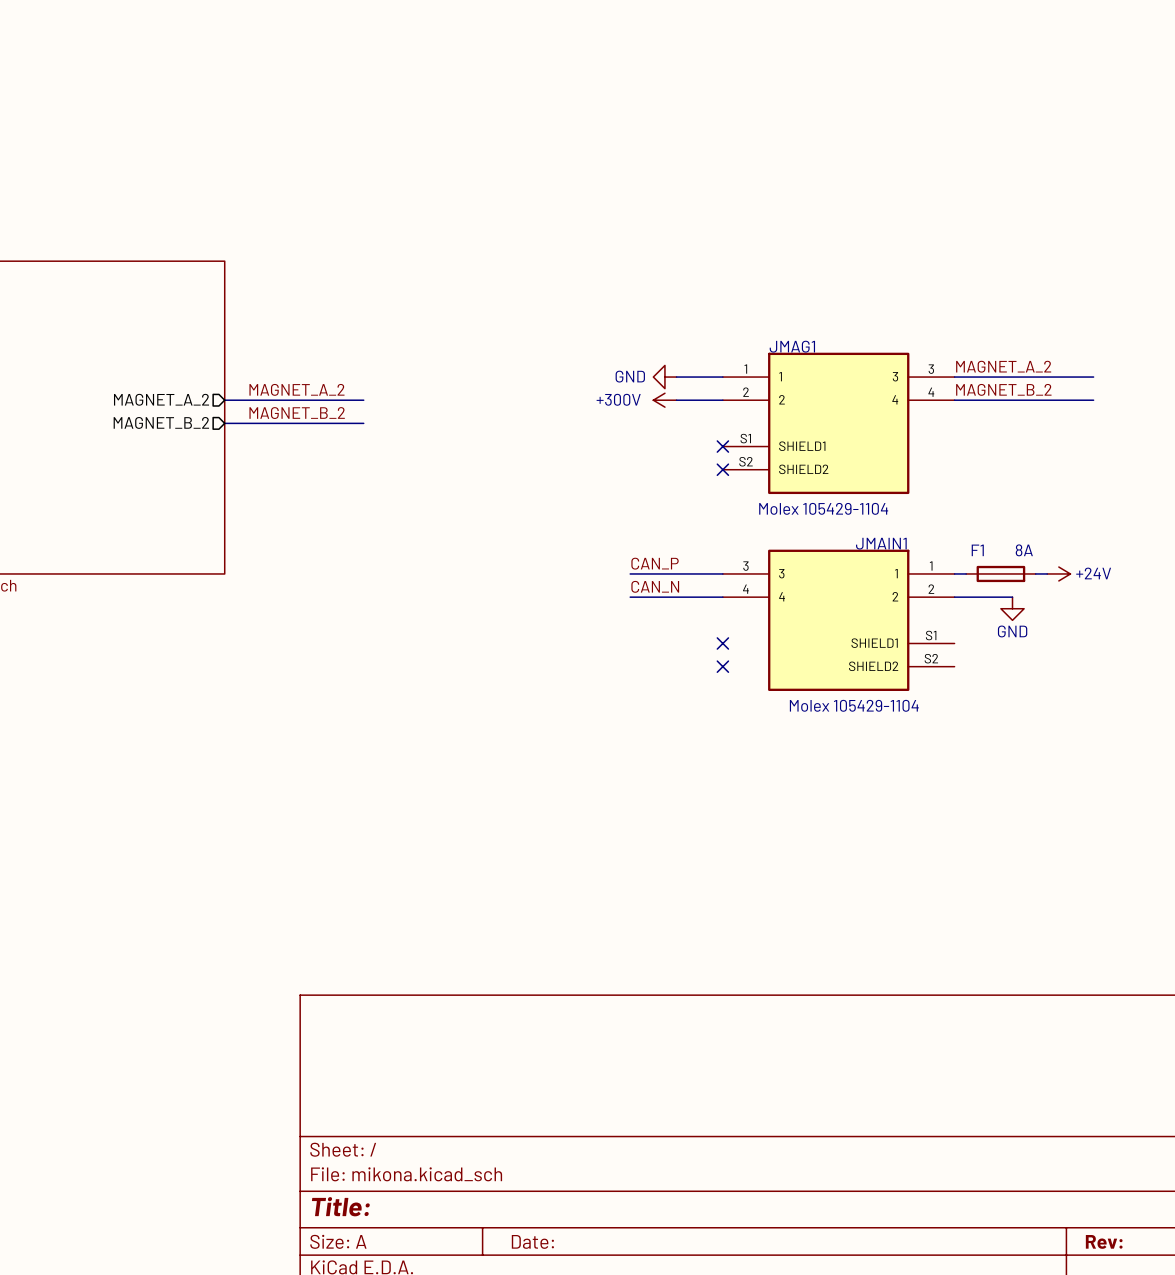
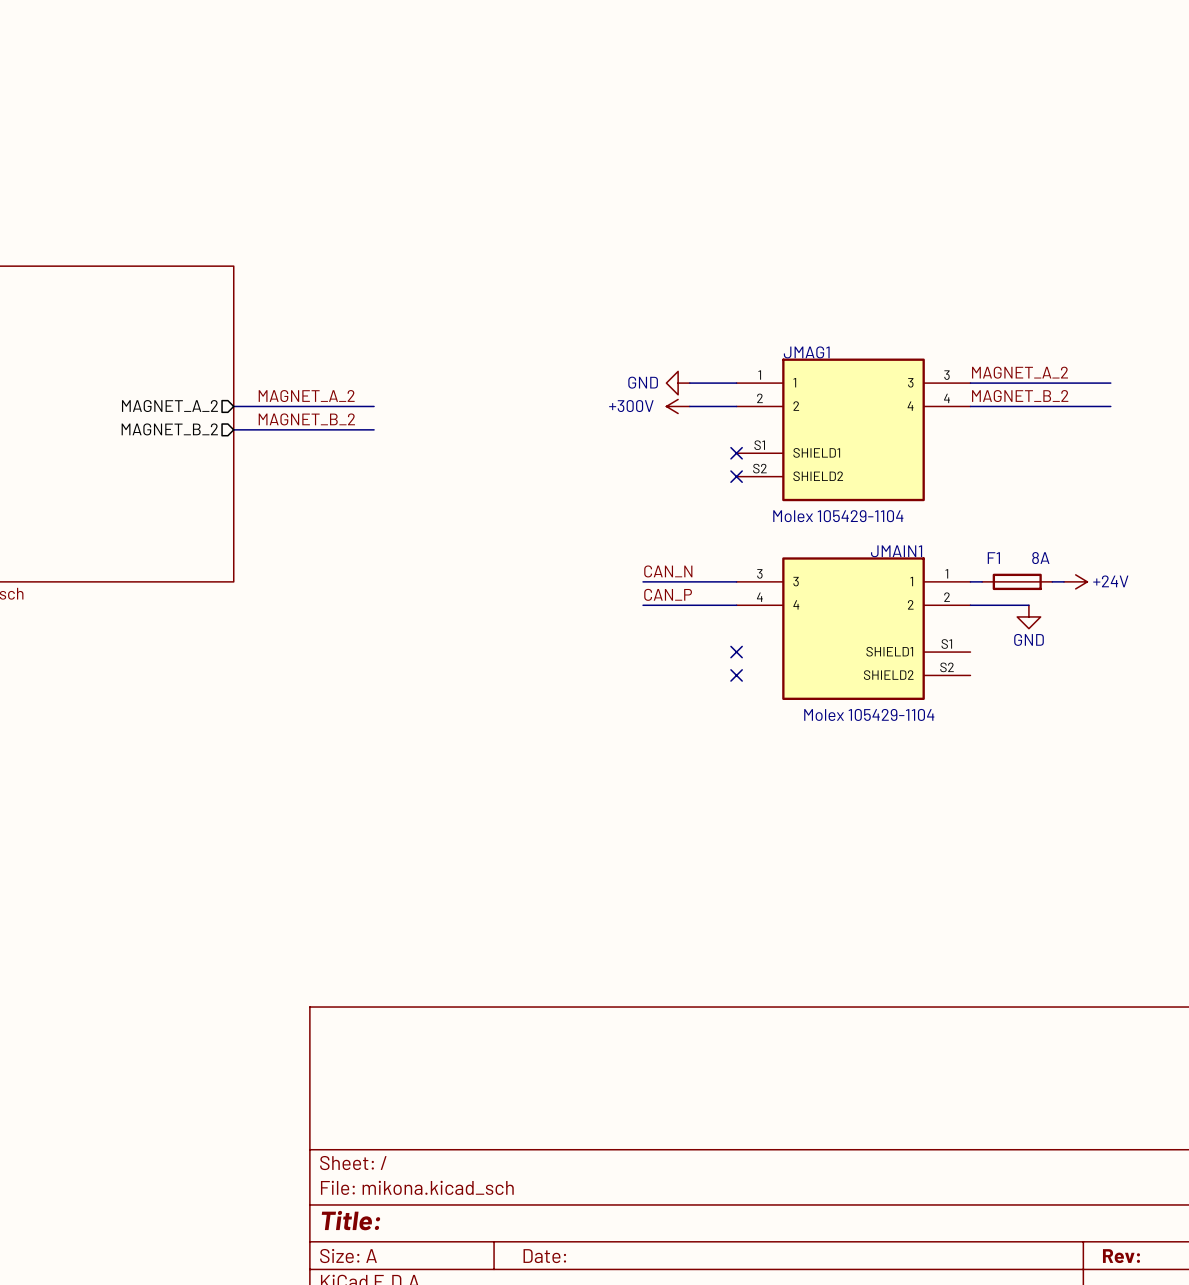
label: CAN_P (655, 563) -> CAN_N (668, 571)
label: CAN_N (655, 586) -> CAN_P (668, 594)

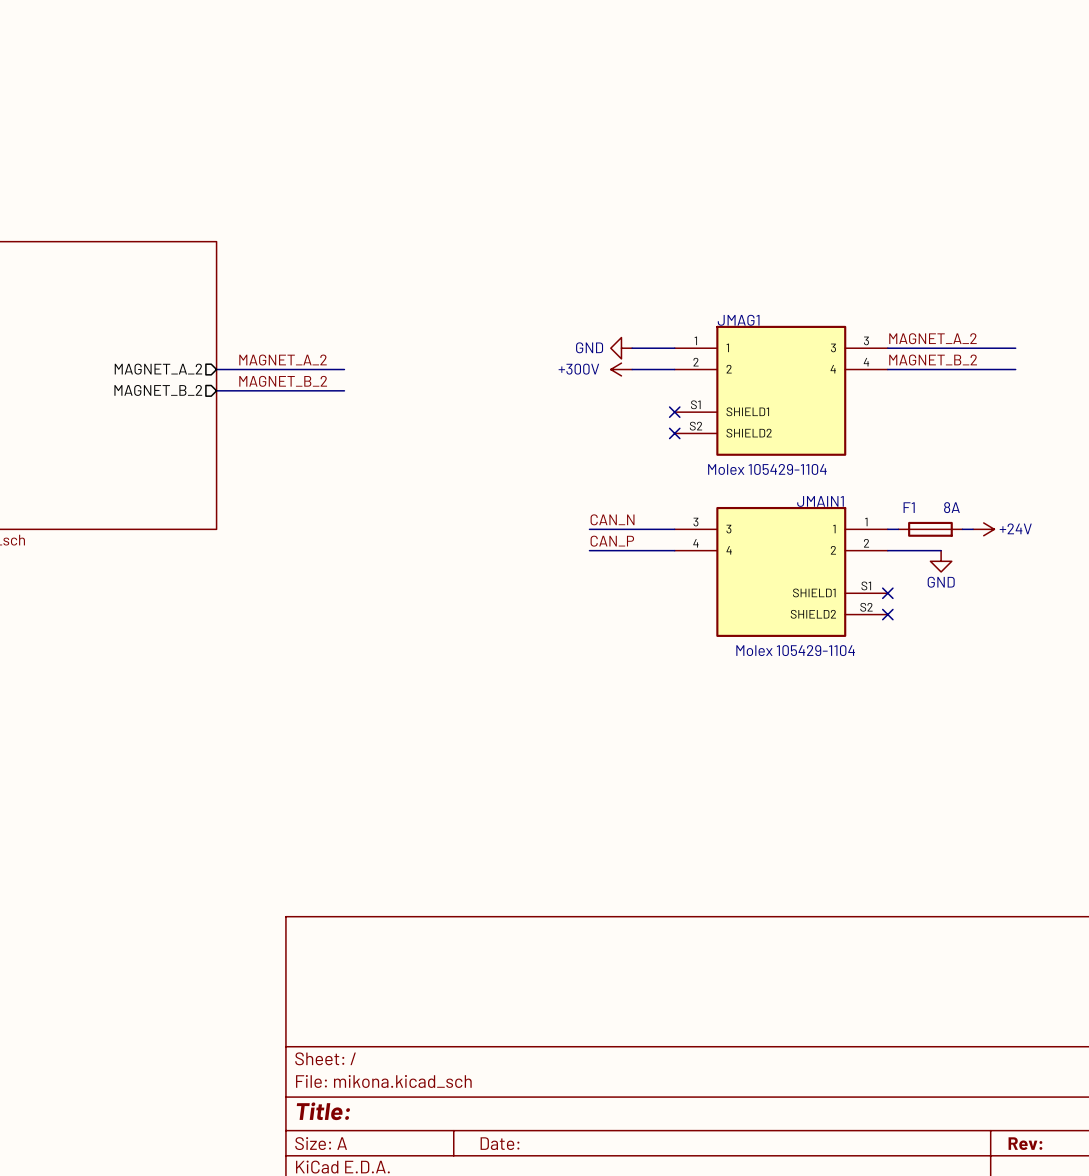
no-connect mark: (736, 652) -> none
no-connect mark: none -> (887, 593)
no-connect mark: (736, 675) -> none
no-connect mark: none -> (887, 614)

